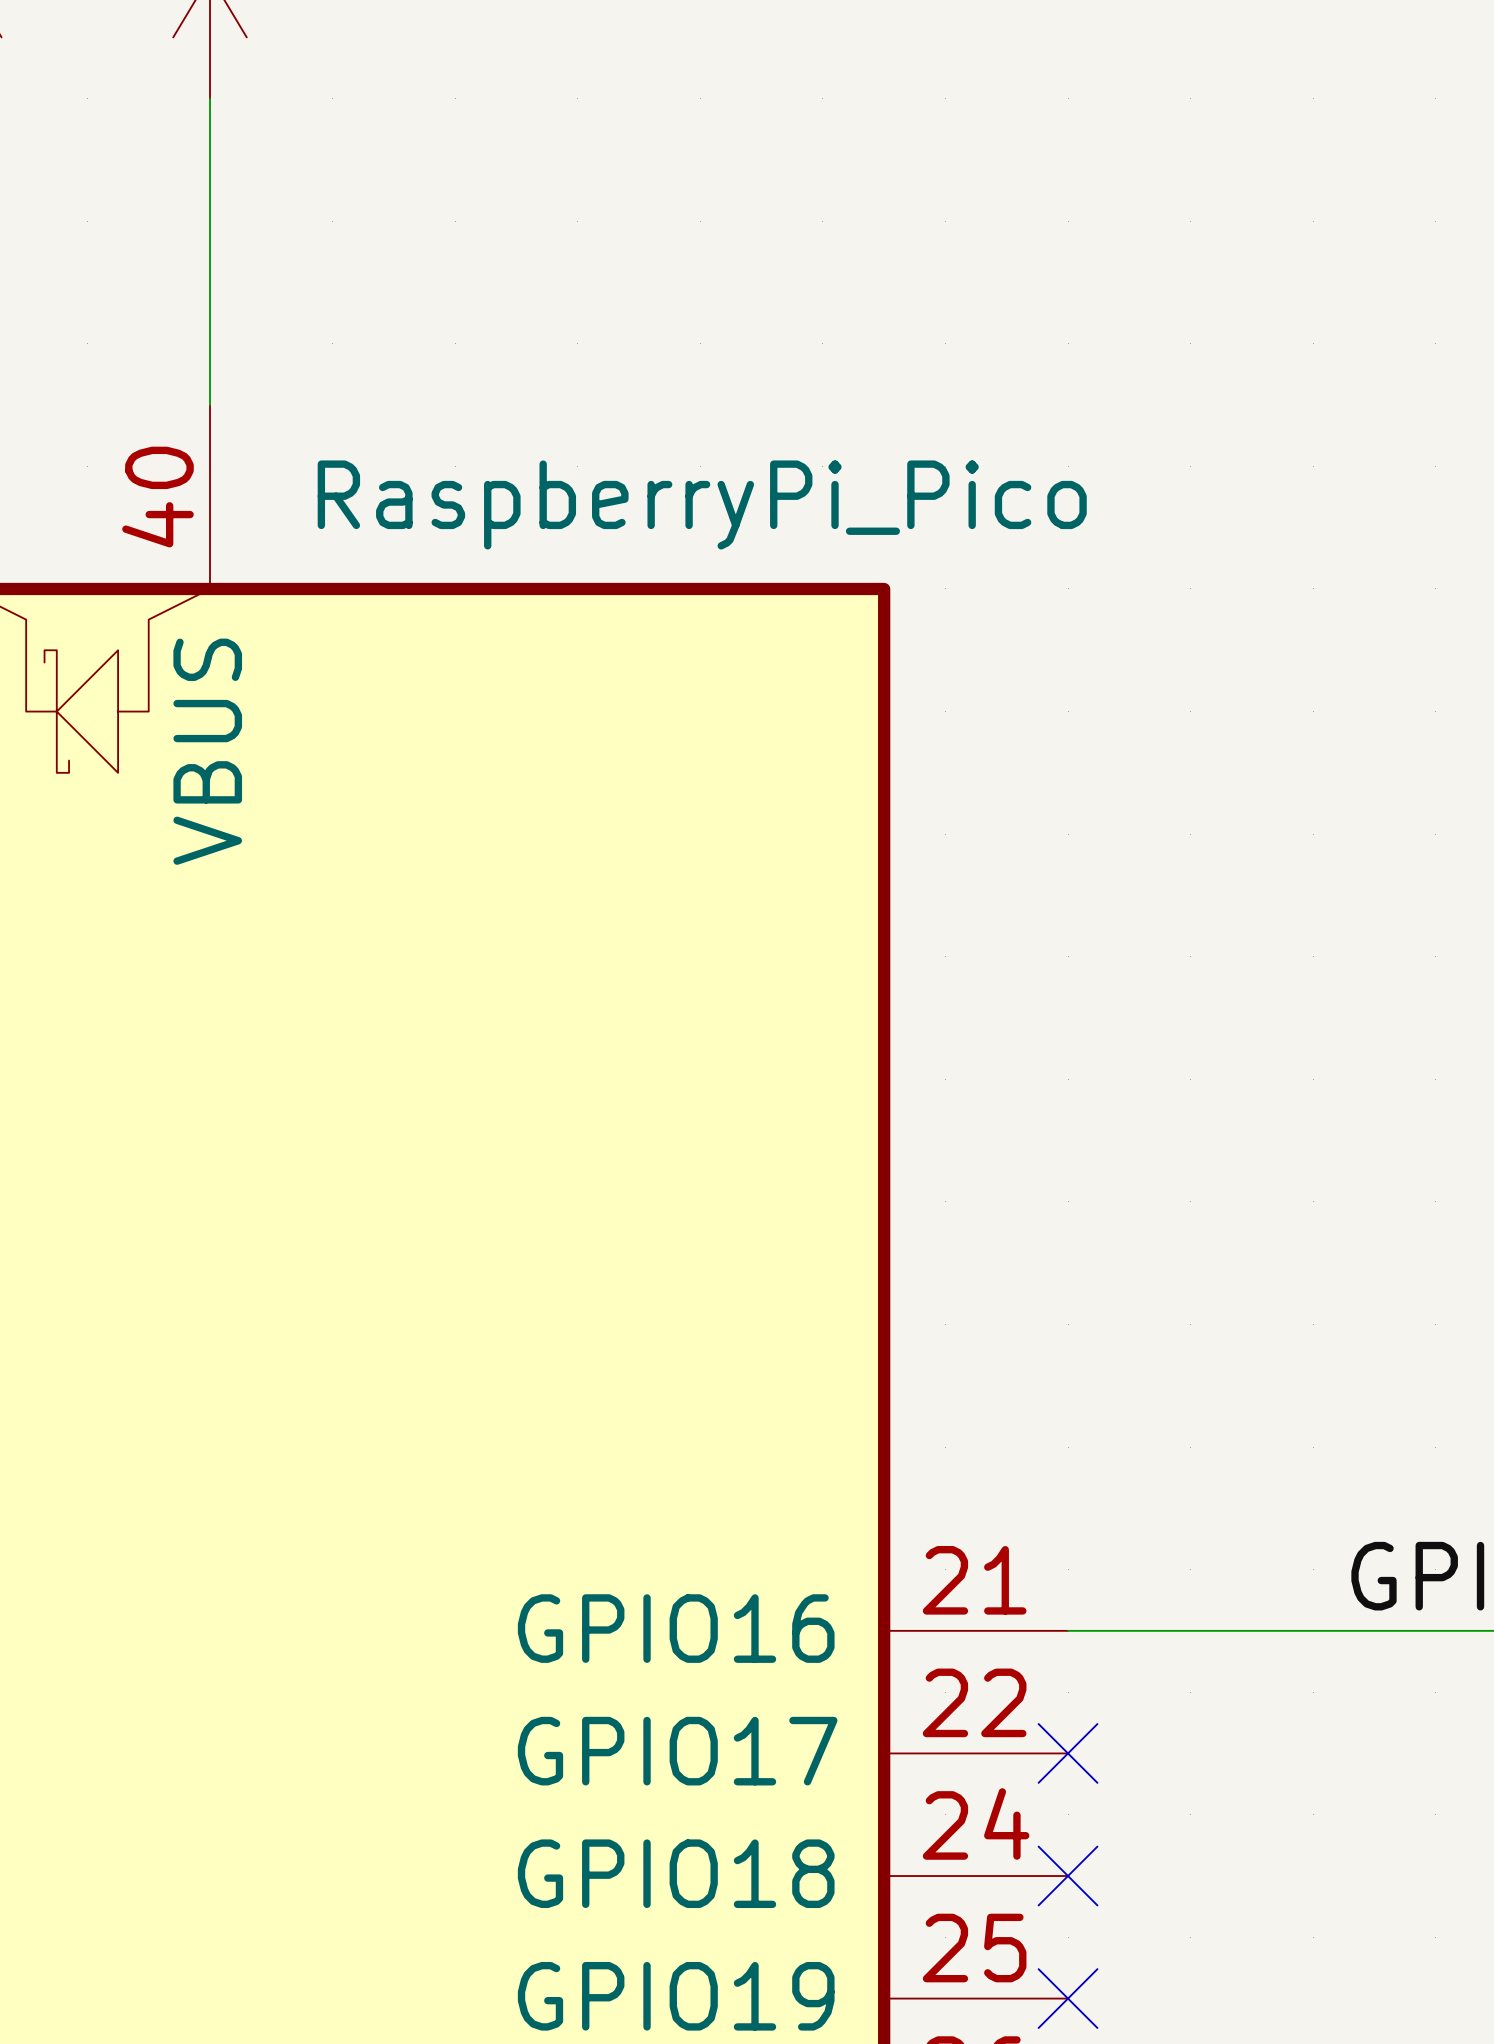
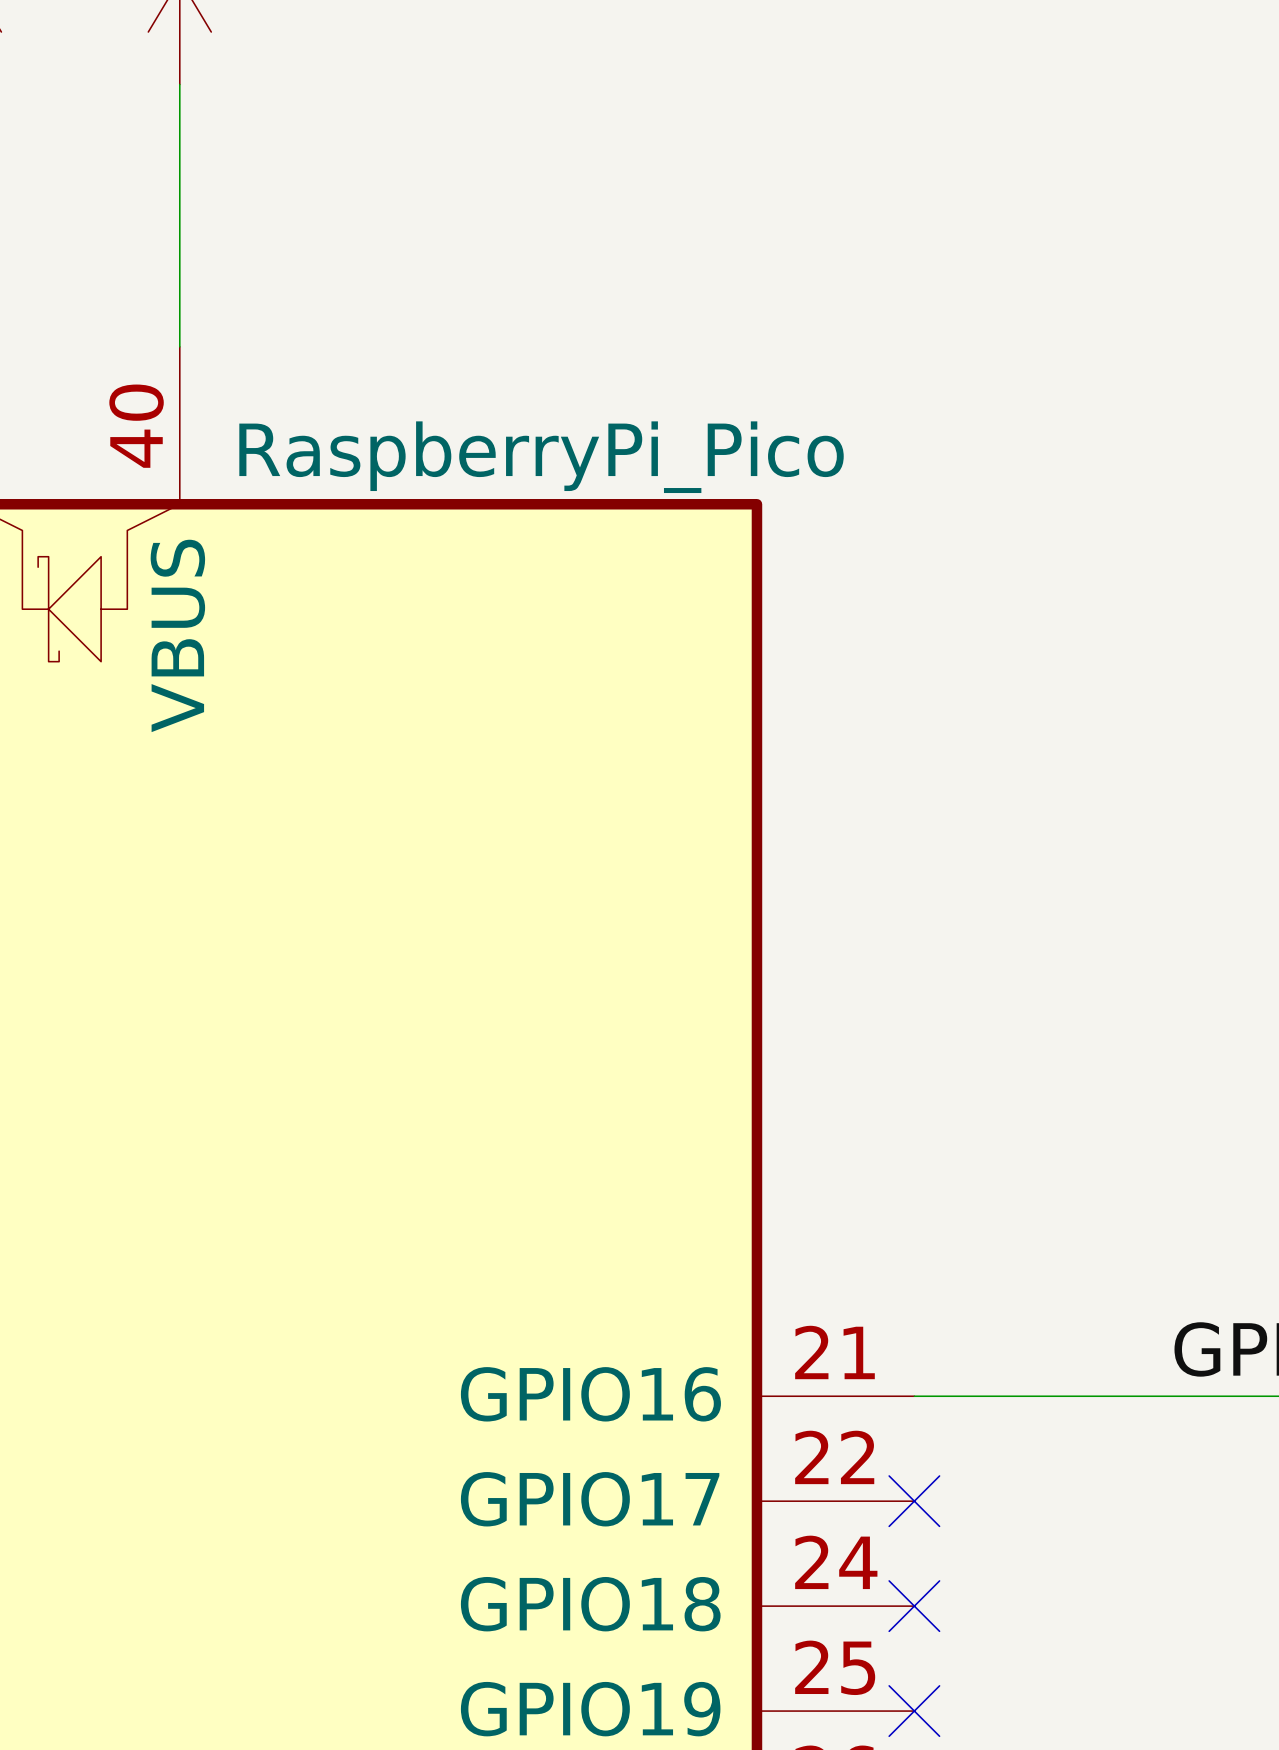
part value position: RaspberryPi_Pico (702, 504) -> RaspberryPi_Pico (541, 457)

